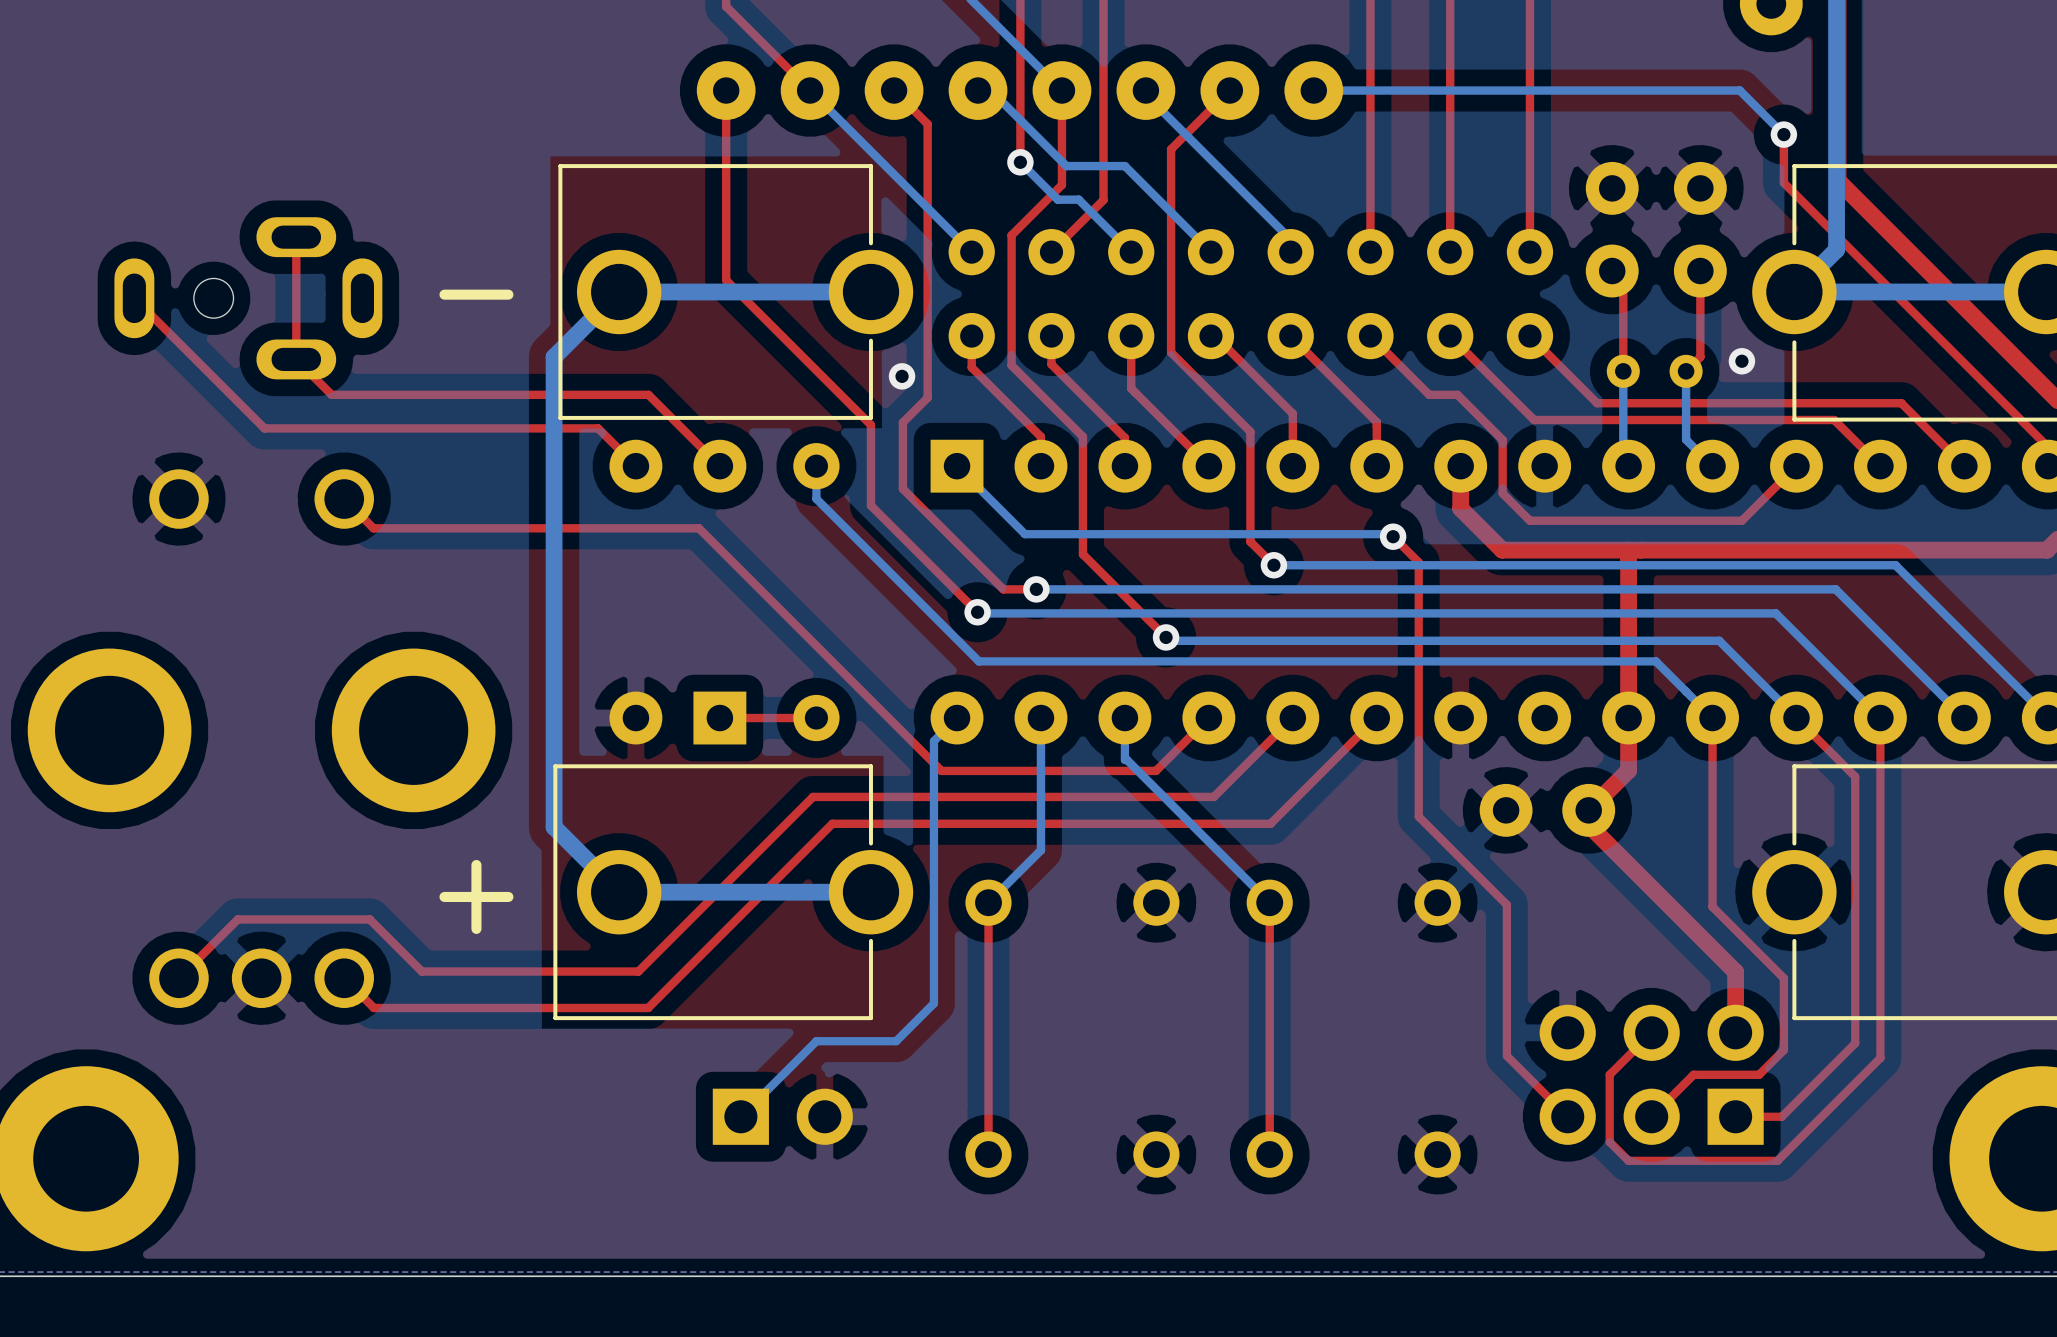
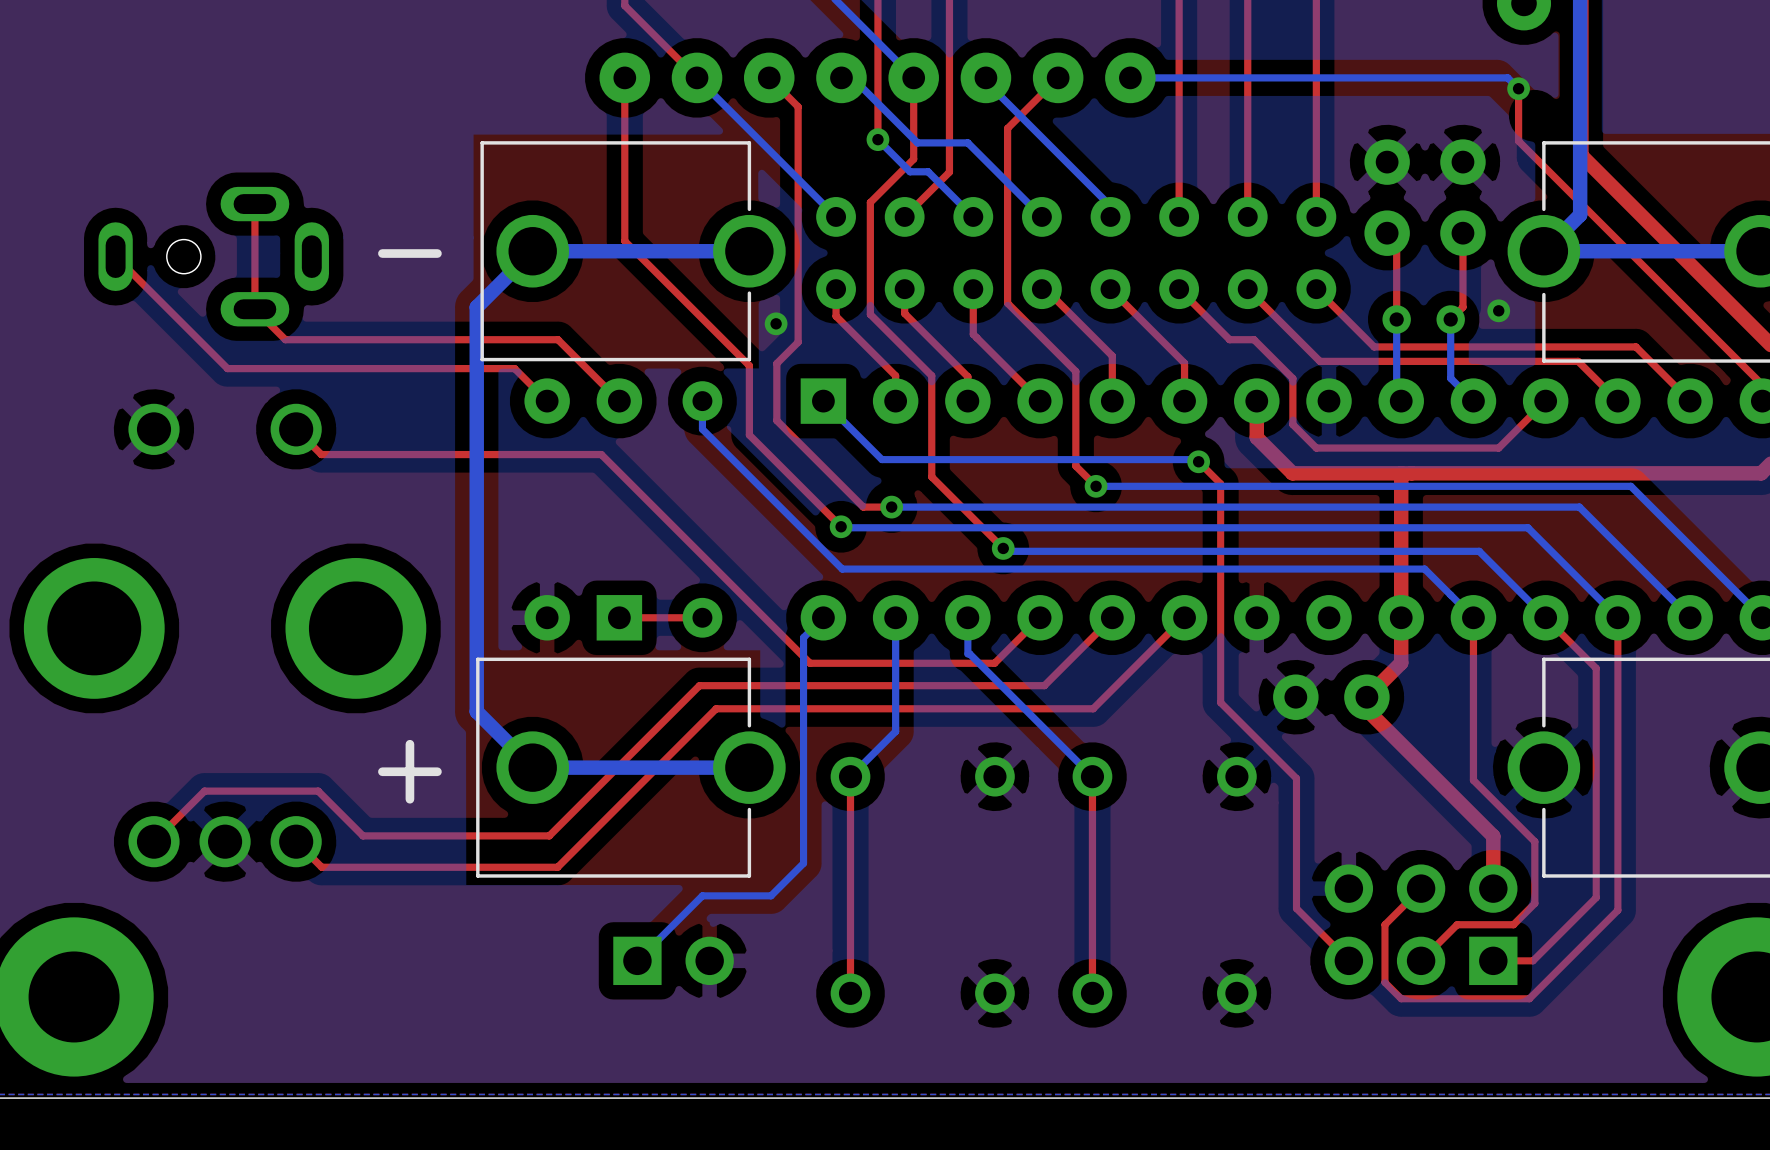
bottom track: (1739, 90) (1783, 134) -> (1496, 77) (1507, 77) (1518, 88)
top track: (1783, 134) (1783, 182) -> (1518, 88) (1518, 141) (1534, 157)
via position: (1783, 134) -> (1518, 88)

